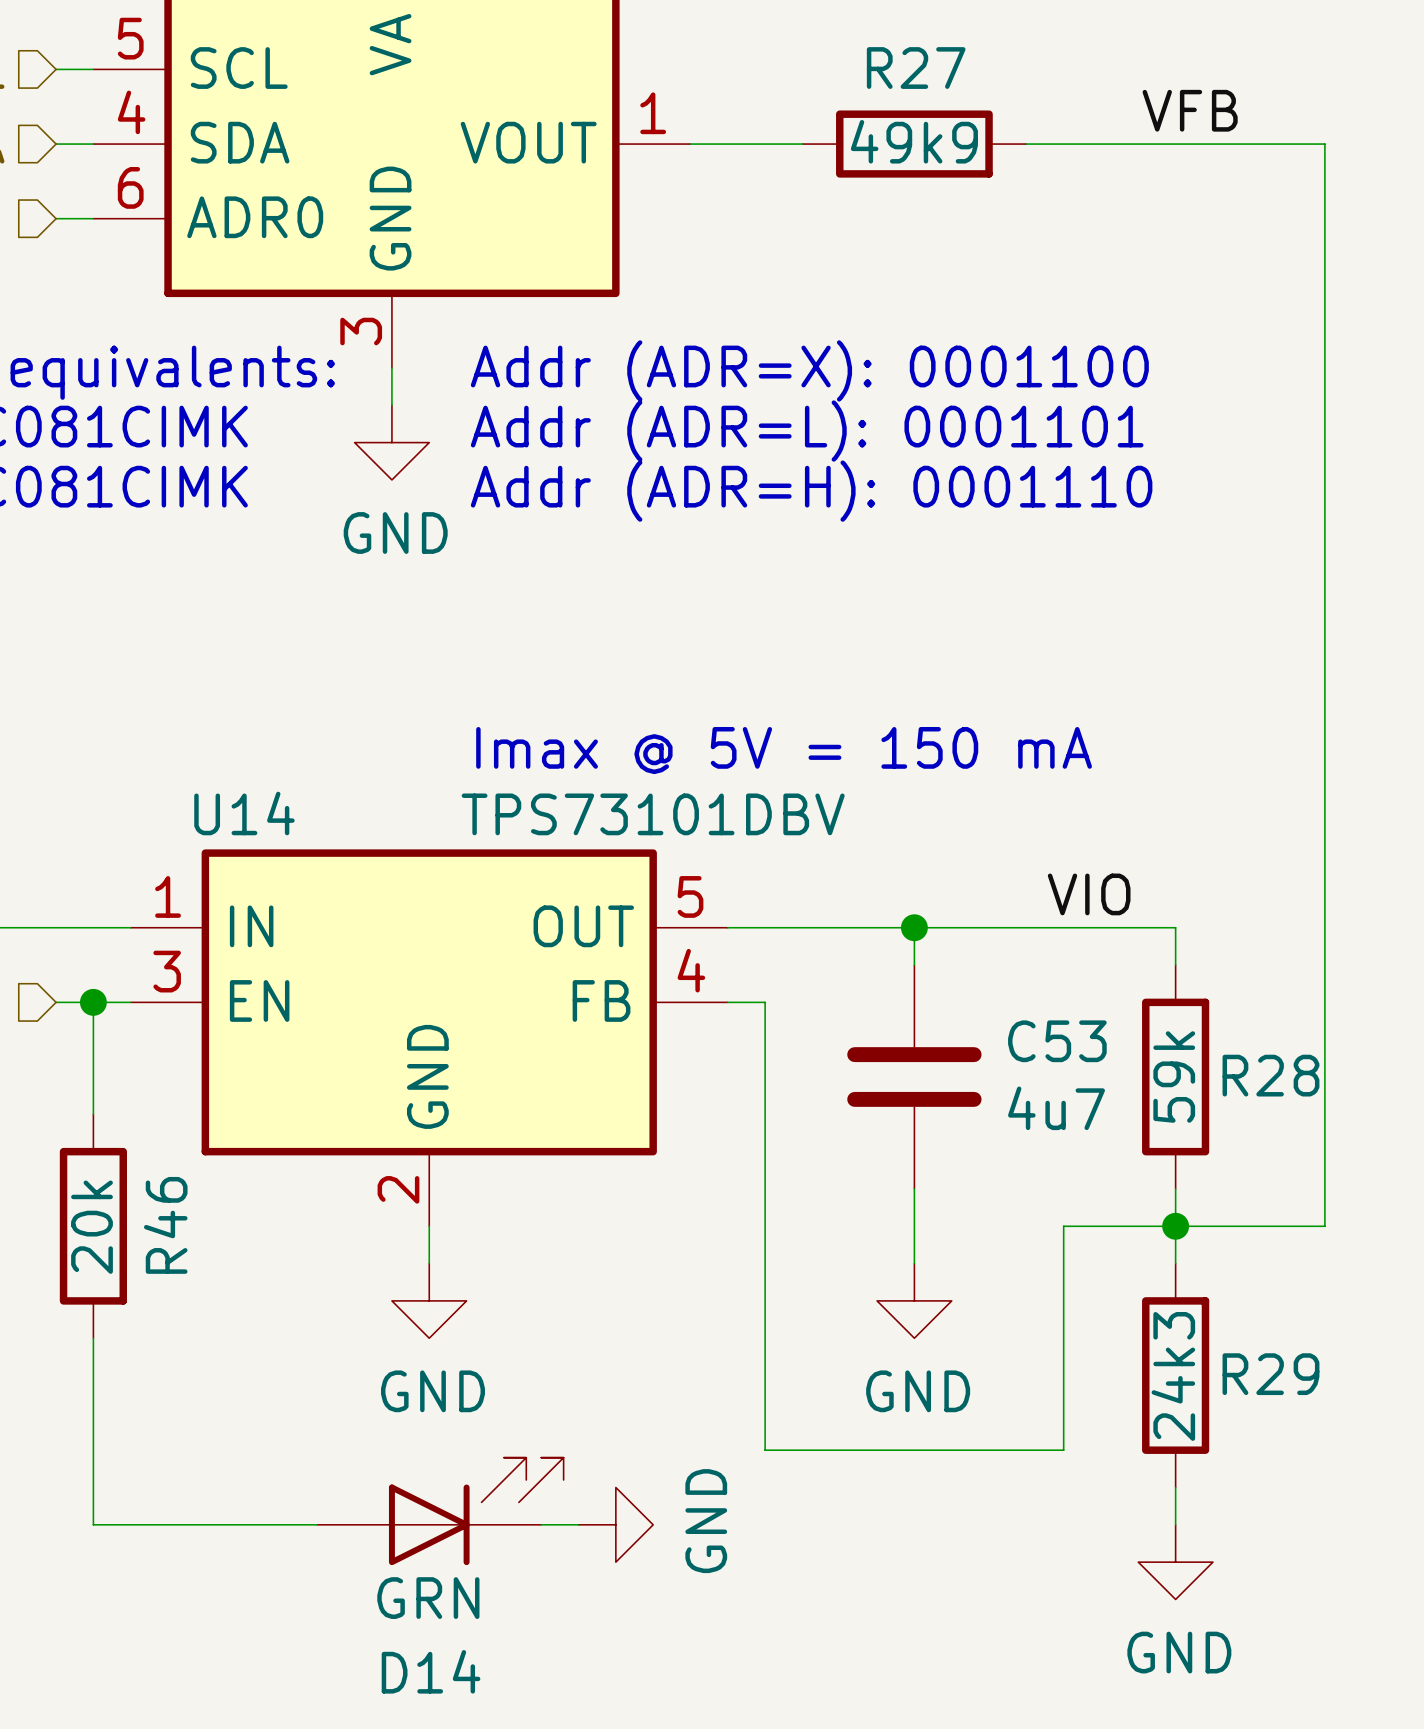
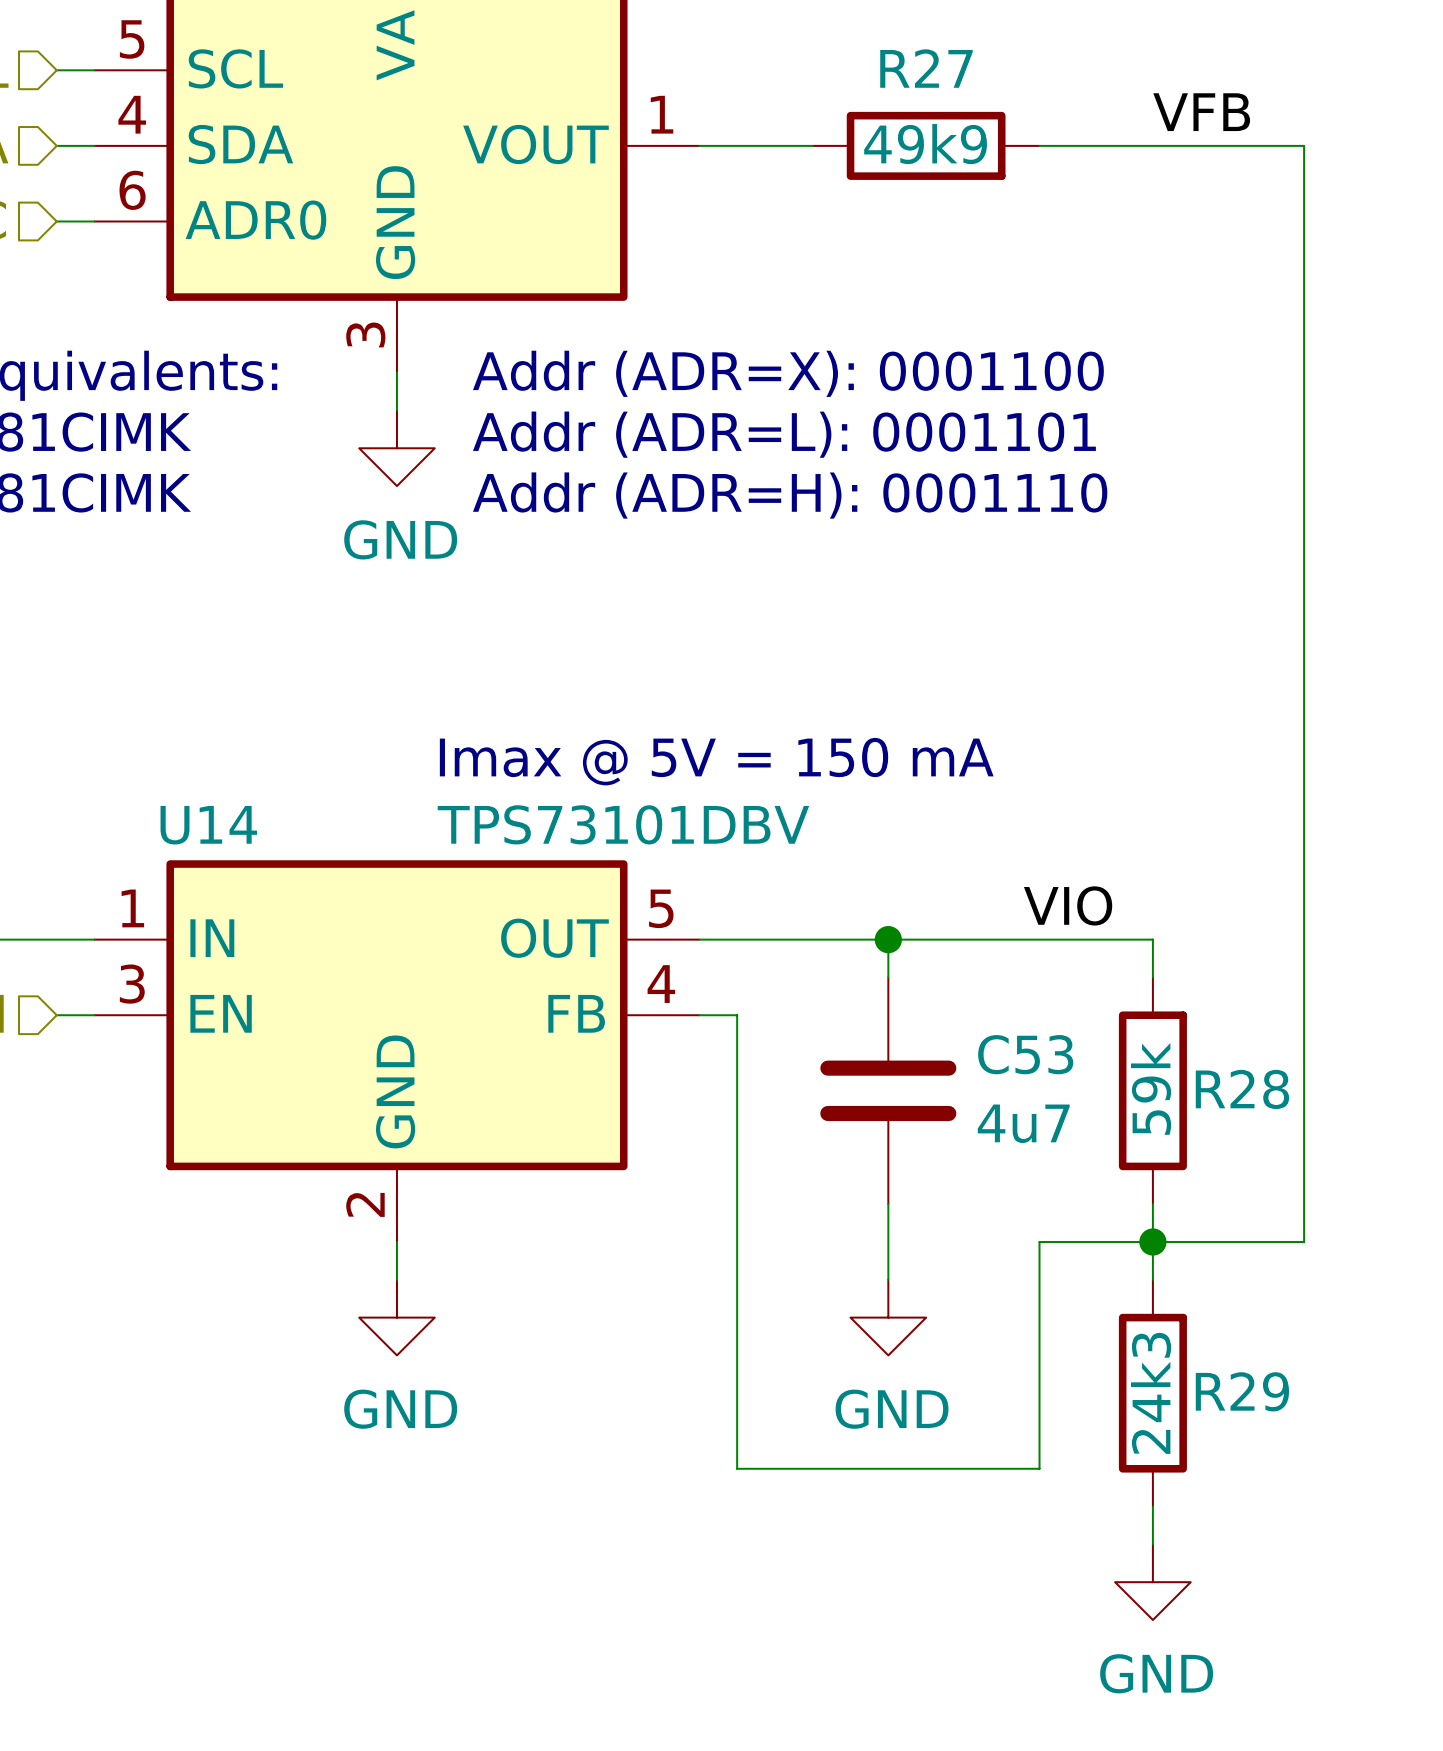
wire: (1287, 144) (1324, 144) (1324, 1226) (1287, 1226) -> (1304, 145) (1304, 1242)
text position: Imax @ 5V = 150 mA (784, 750) -> Imax @ 5V = 150 mA (716, 761)
label position: VIO (1089, 894) -> VIO (1068, 905)
wire: (914, 927) (914, 965) -> (888, 939) (888, 977)
junction position: (914, 927) -> (888, 939)
wire: (1138, 927) (1175, 927) (1175, 965) -> (1152, 939) (1152, 977)
junction: (93, 1002) -> none
wire: (130, 1002) (93, 1002) (93, 1114) -> none
wire: (727, 1002) (765, 1002) (765, 1450) -> (699, 1015) (737, 1015) (737, 1468) (774, 1468)
U14 position: (429, 1037) -> (396, 1051)
C53 position: (914, 1077) -> (888, 1090)
R28 position: (1175, 1077) -> (1152, 1090)
wire: (914, 1188) (914, 1263) -> (888, 1204) (888, 1279)
wire: (1175, 1188) (1175, 1263) -> (1152, 1204) (1152, 1279)
R46: 20k (93, 1226) -> none
wire: (429, 1226) (429, 1263) -> (396, 1242) (396, 1279)
wire: (1063, 1226) (1063, 1450) (1026, 1450) -> (1077, 1242) (1039, 1242) (1039, 1468)
junction position: (1175, 1226) -> (1152, 1242)
power symbol position: GND (429, 1300) -> GND (396, 1317)
power symbol position: GND (914, 1300) -> GND (888, 1317)
wire: (93, 1338) (93, 1524) (317, 1524) -> none
R29 position: (1175, 1375) -> (1152, 1393)
wire: (1175, 1487) (1175, 1524) -> (1152, 1506) (1152, 1544)
D14: GRN (440, 1511) -> none
wire: (541, 1524) (578, 1524) -> none
power symbol: GND (615, 1524) -> none
power symbol position: GND (1175, 1562) -> GND (1152, 1582)

